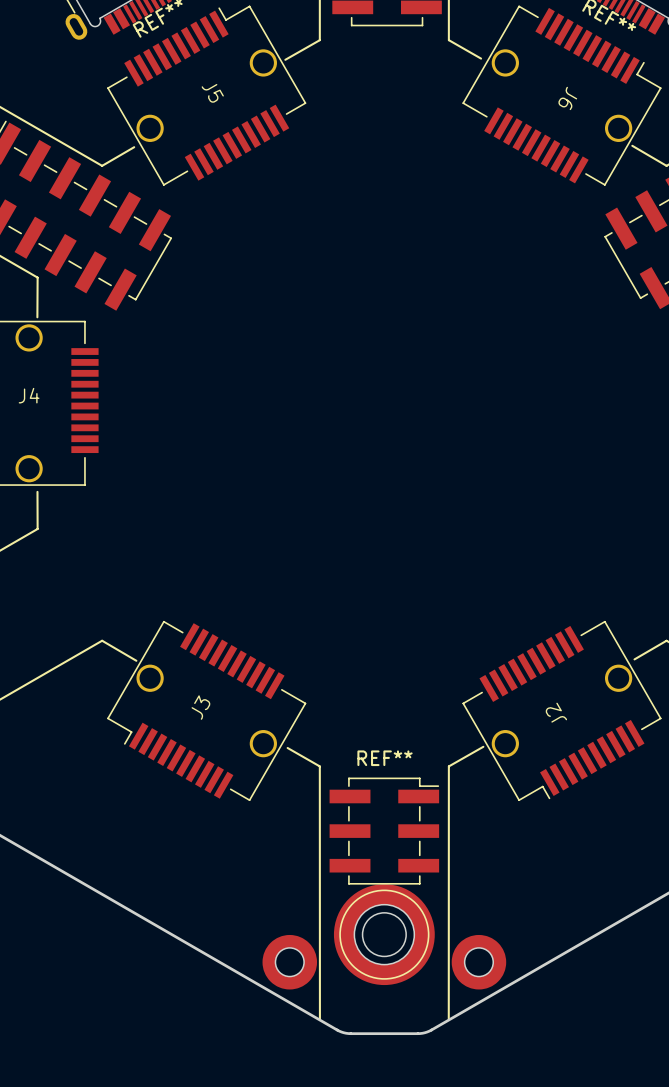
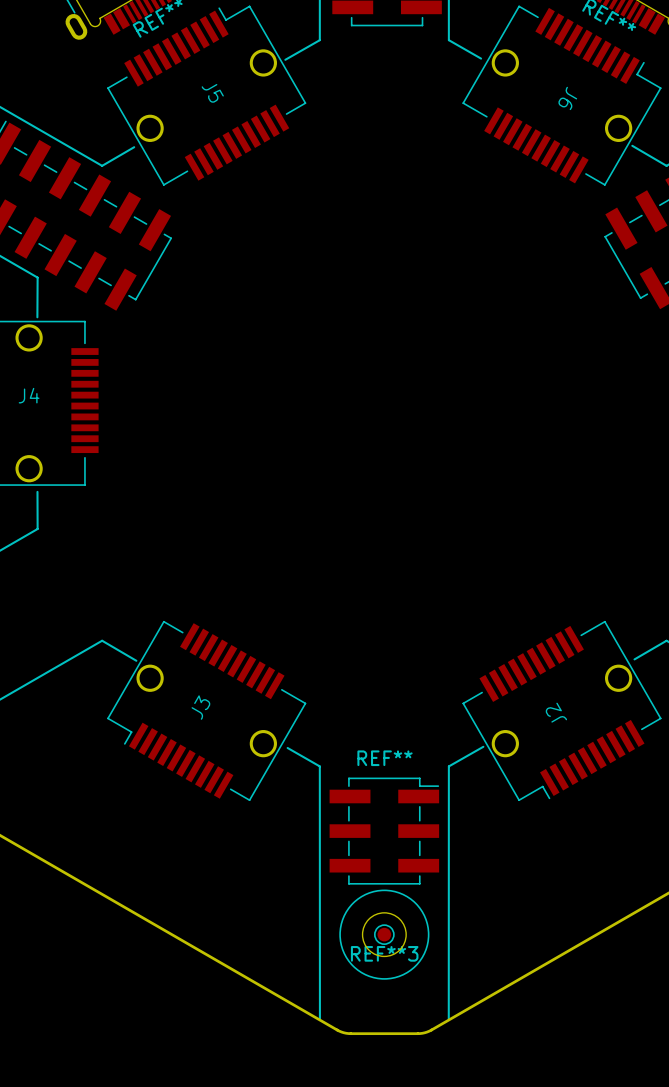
part: (384, 934) -> none
REF**3: none -> (384, 934)
part: (289, 962) -> none
part: (478, 962) -> none

